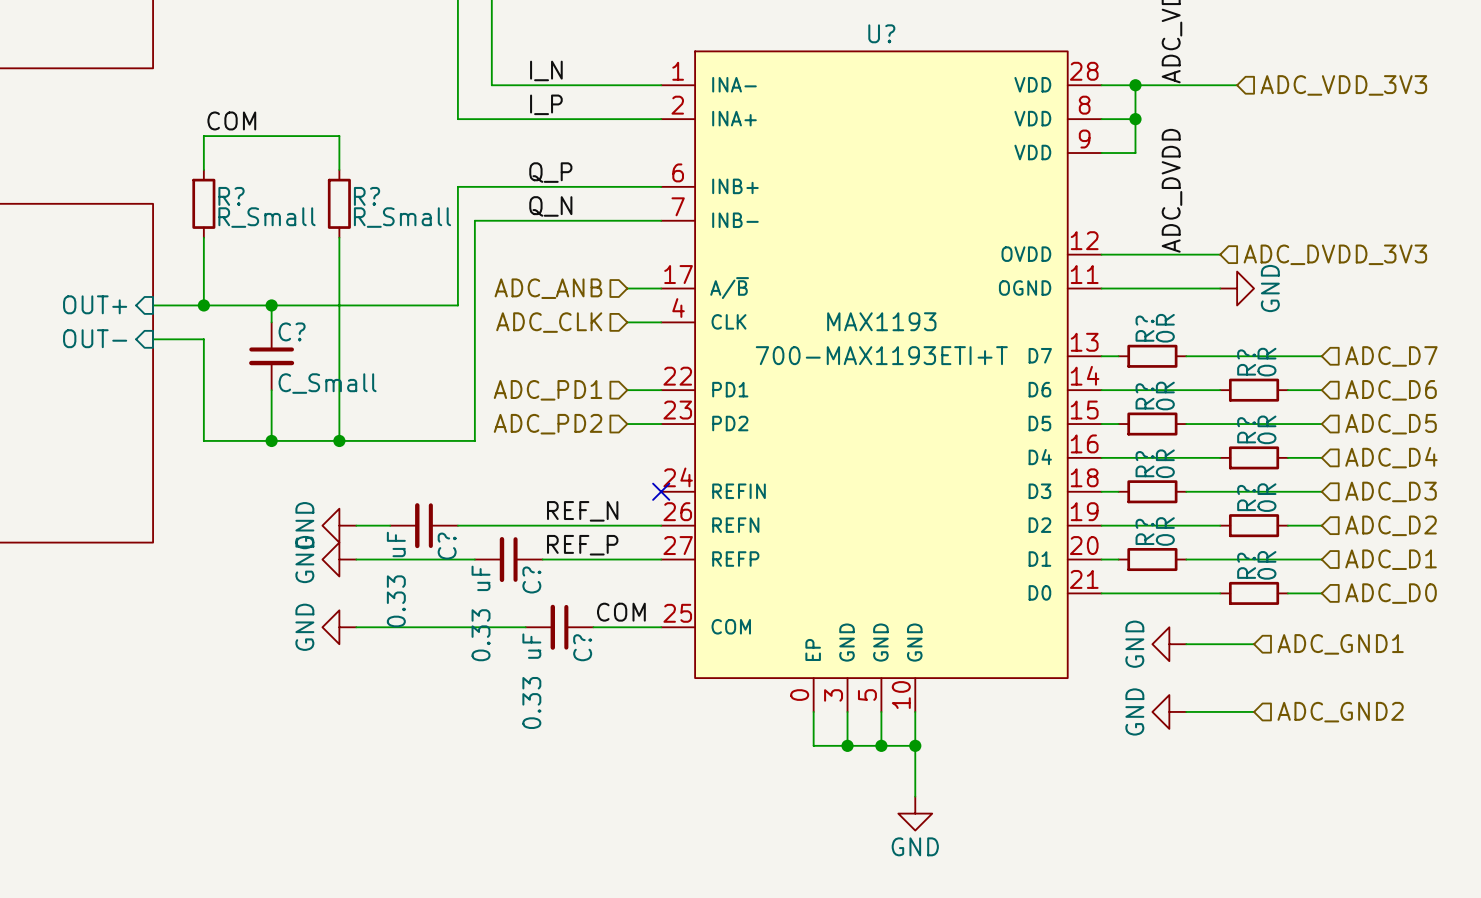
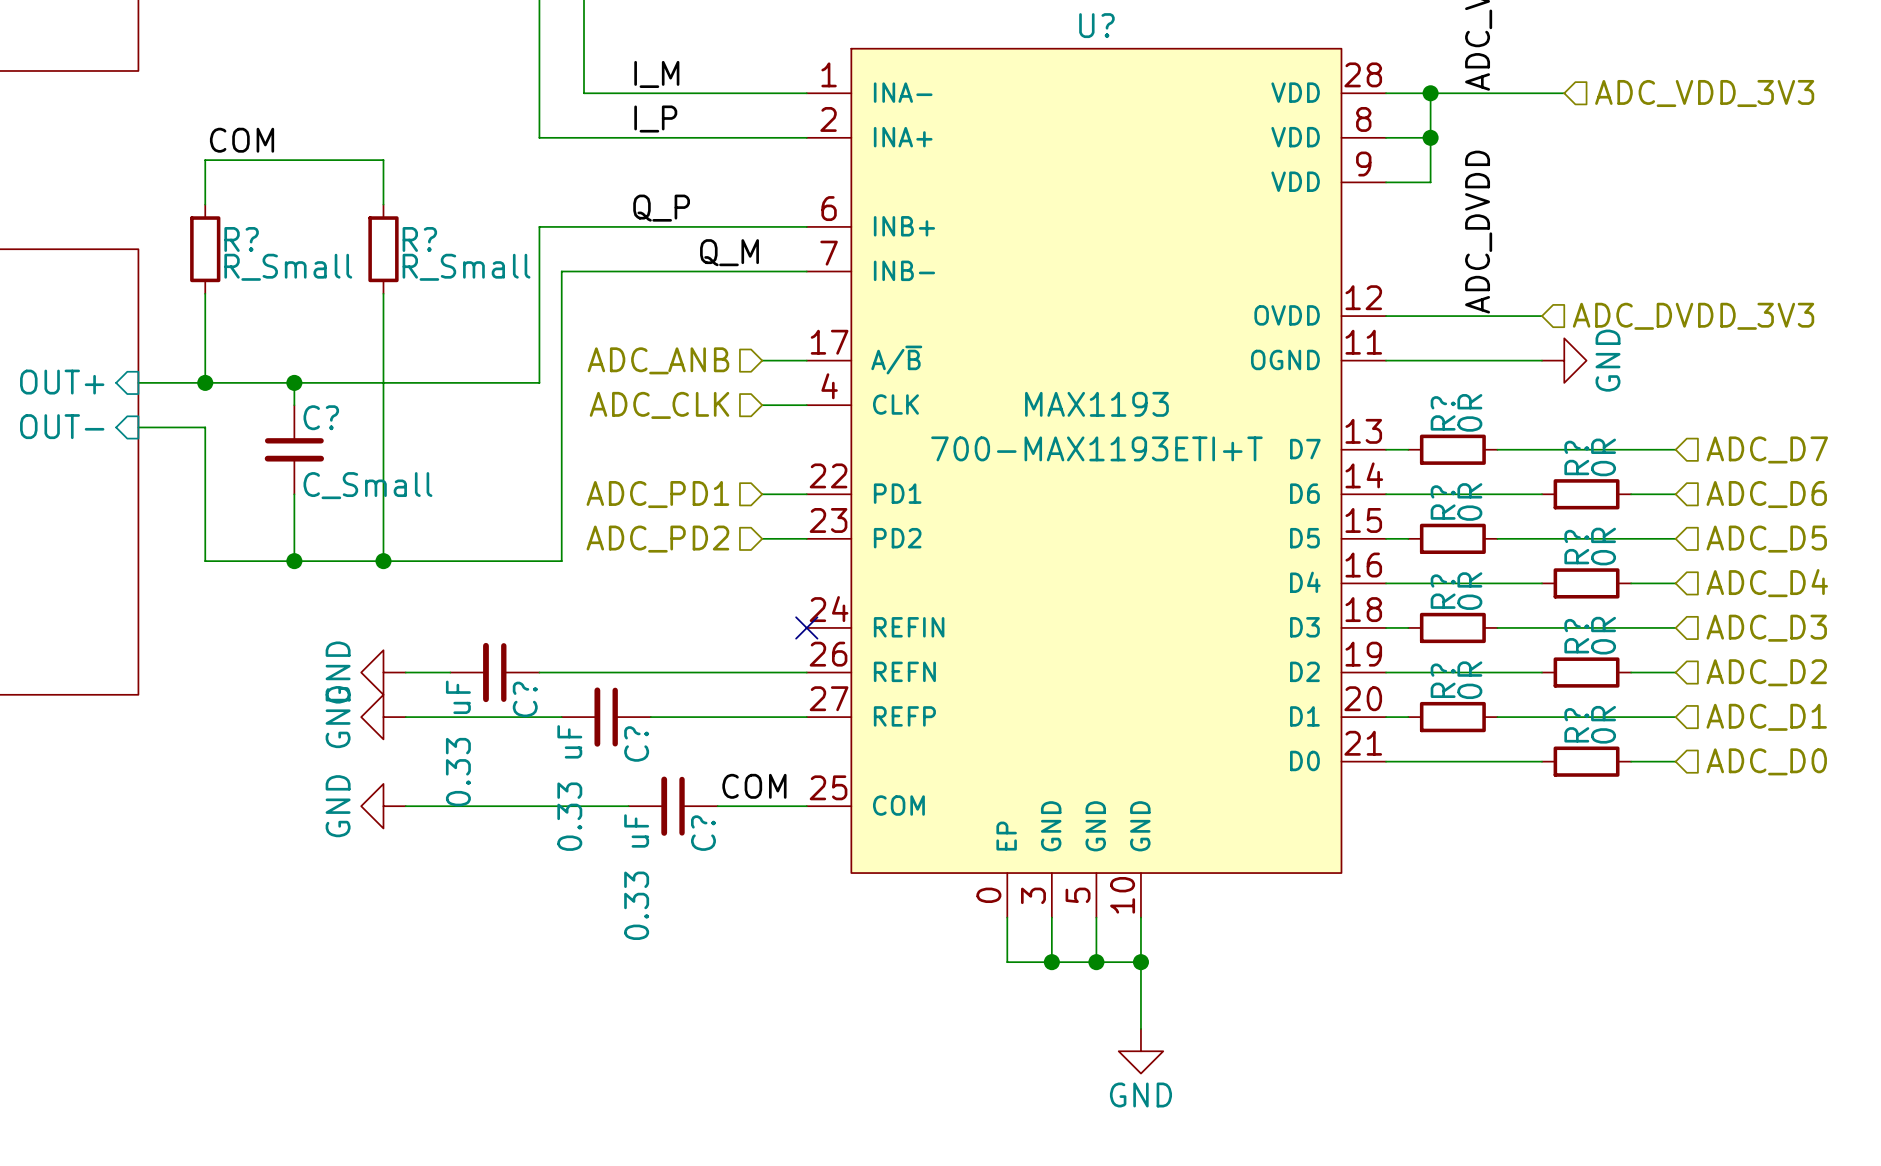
label: I_N (546, 70) -> I_M (656, 74)
label: Q_N (550, 206) -> Q_M (729, 252)
label: REF_N (582, 511) -> none
label: REF_P (582, 545) -> none
power symbol: GND (1169, 644) -> none
wire: (1186, 644) (1254, 644) -> none
hierarchical label: ADC_GND1 (1340, 644) -> none
power symbol: GND (1169, 711) -> none
wire: (1186, 711) (1254, 711) -> none
hierarchical label: ADC_GND2 (1340, 712) -> none

